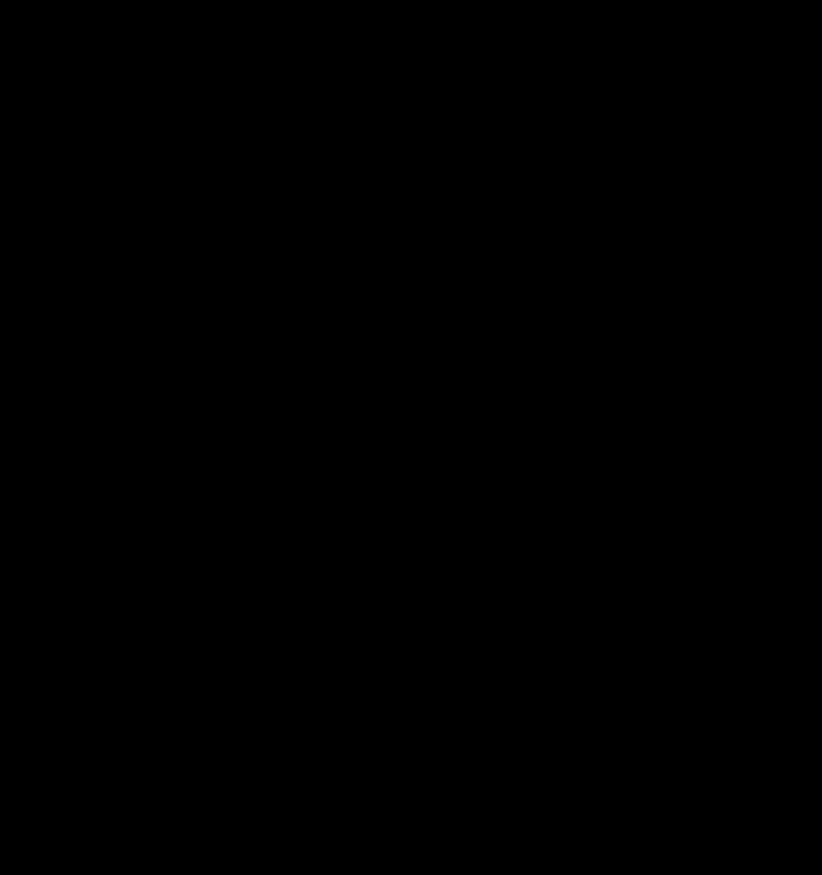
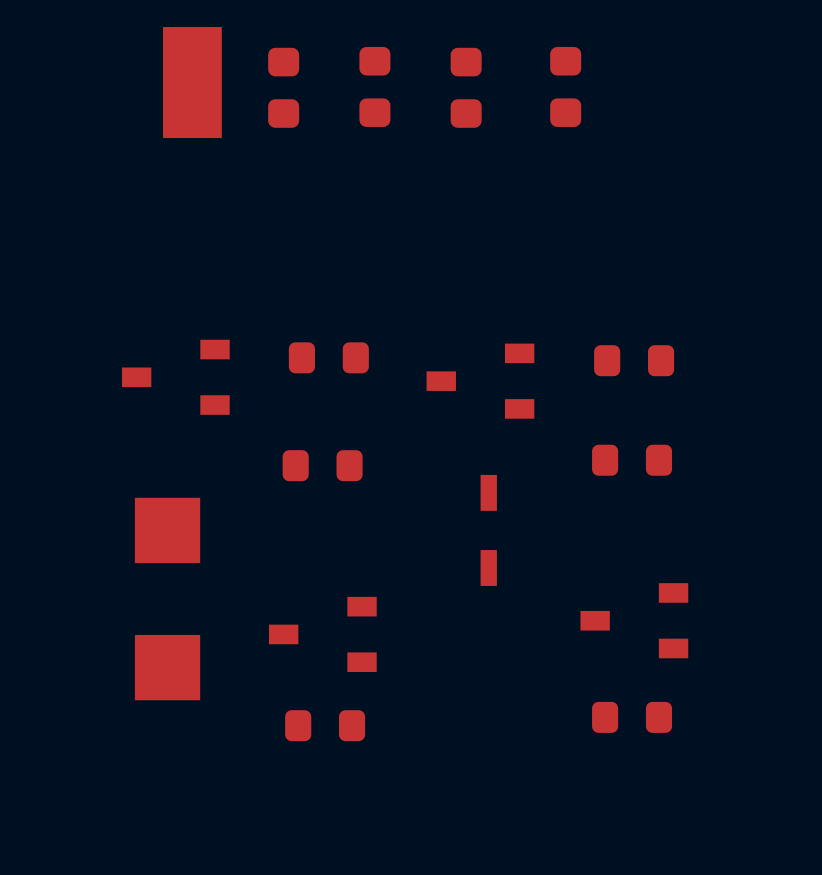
part: none -> (192, 82)
part: none -> (374, 86)
part: none -> (565, 86)
part: none -> (283, 87)
part: none -> (466, 87)
part: none -> (328, 357)
part: none -> (634, 360)
part: none -> (175, 377)
part: none -> (480, 381)
part: none -> (632, 460)
part: none -> (322, 465)
part: none -> (488, 530)
part: none -> (167, 599)
part: none -> (634, 620)
part: none -> (322, 634)
part: none -> (632, 717)
part: none -> (325, 725)

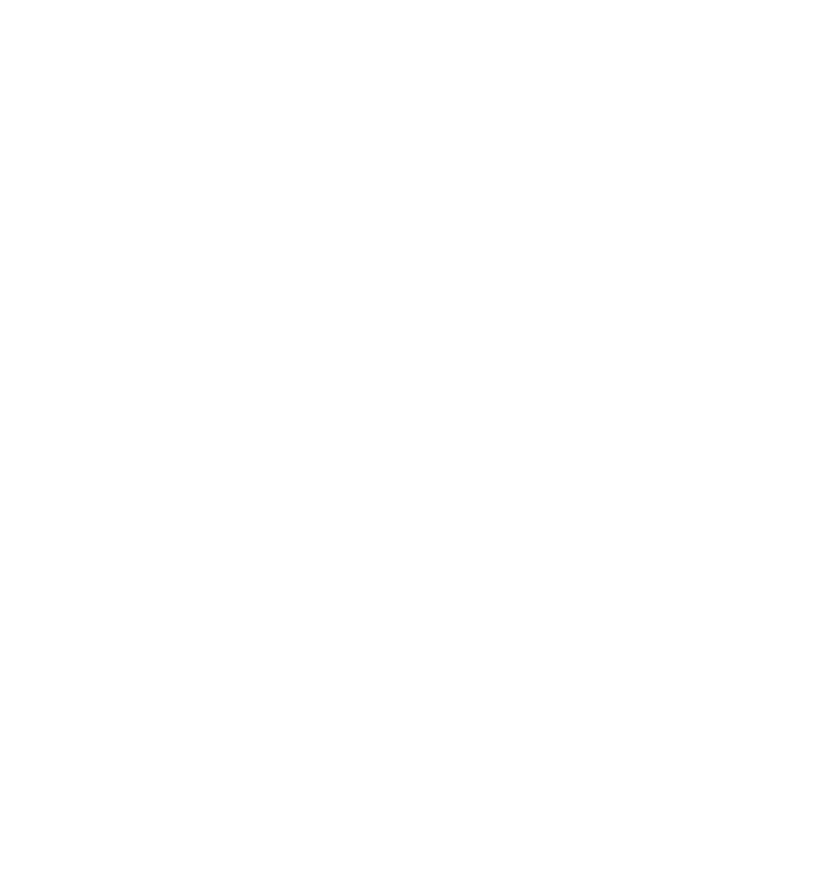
part: (192, 82) -> none
part: (374, 86) -> none
part: (565, 86) -> none
part: (283, 87) -> none
part: (466, 87) -> none
part: (328, 357) -> none
part: (634, 360) -> none
part: (175, 377) -> none
part: (480, 381) -> none
part: (632, 460) -> none
part: (322, 465) -> none
part: (488, 530) -> none
part: (167, 599) -> none
part: (634, 620) -> none
part: (322, 634) -> none
part: (632, 717) -> none
part: (325, 725) -> none

